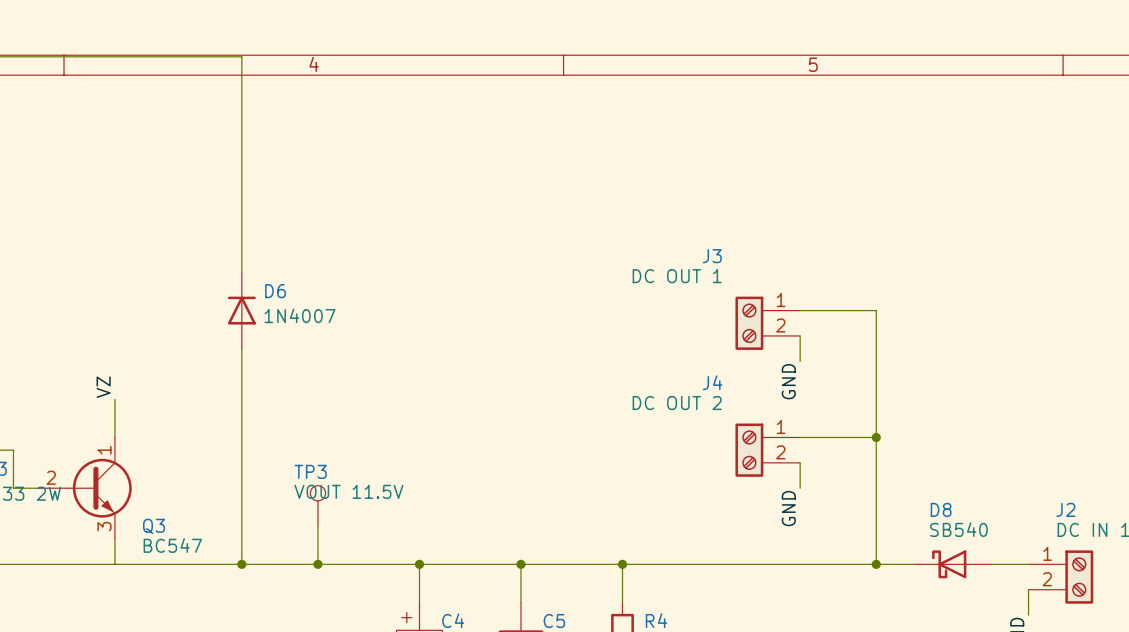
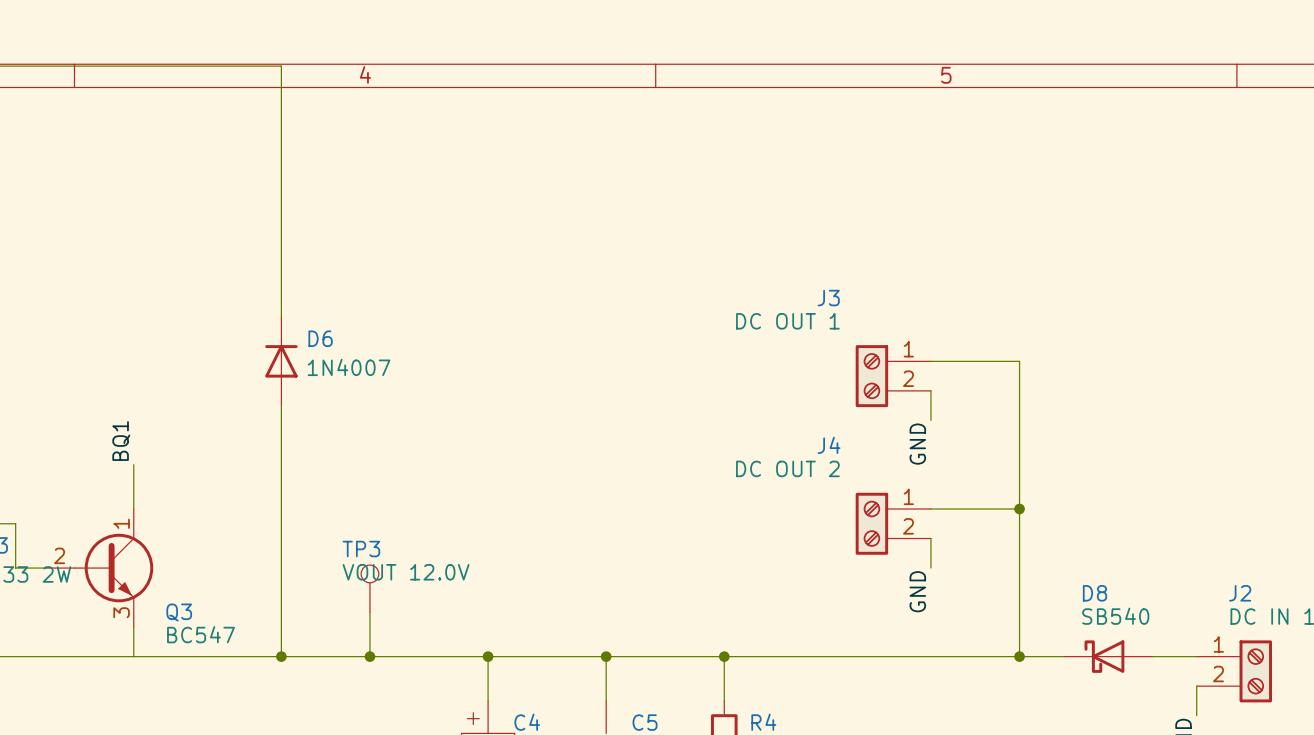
label: VZ (103, 387) -> BQ1 (121, 441)
TP3 value: VOUT 11.5V (348, 491) -> VOUT 12.0V (406, 572)

